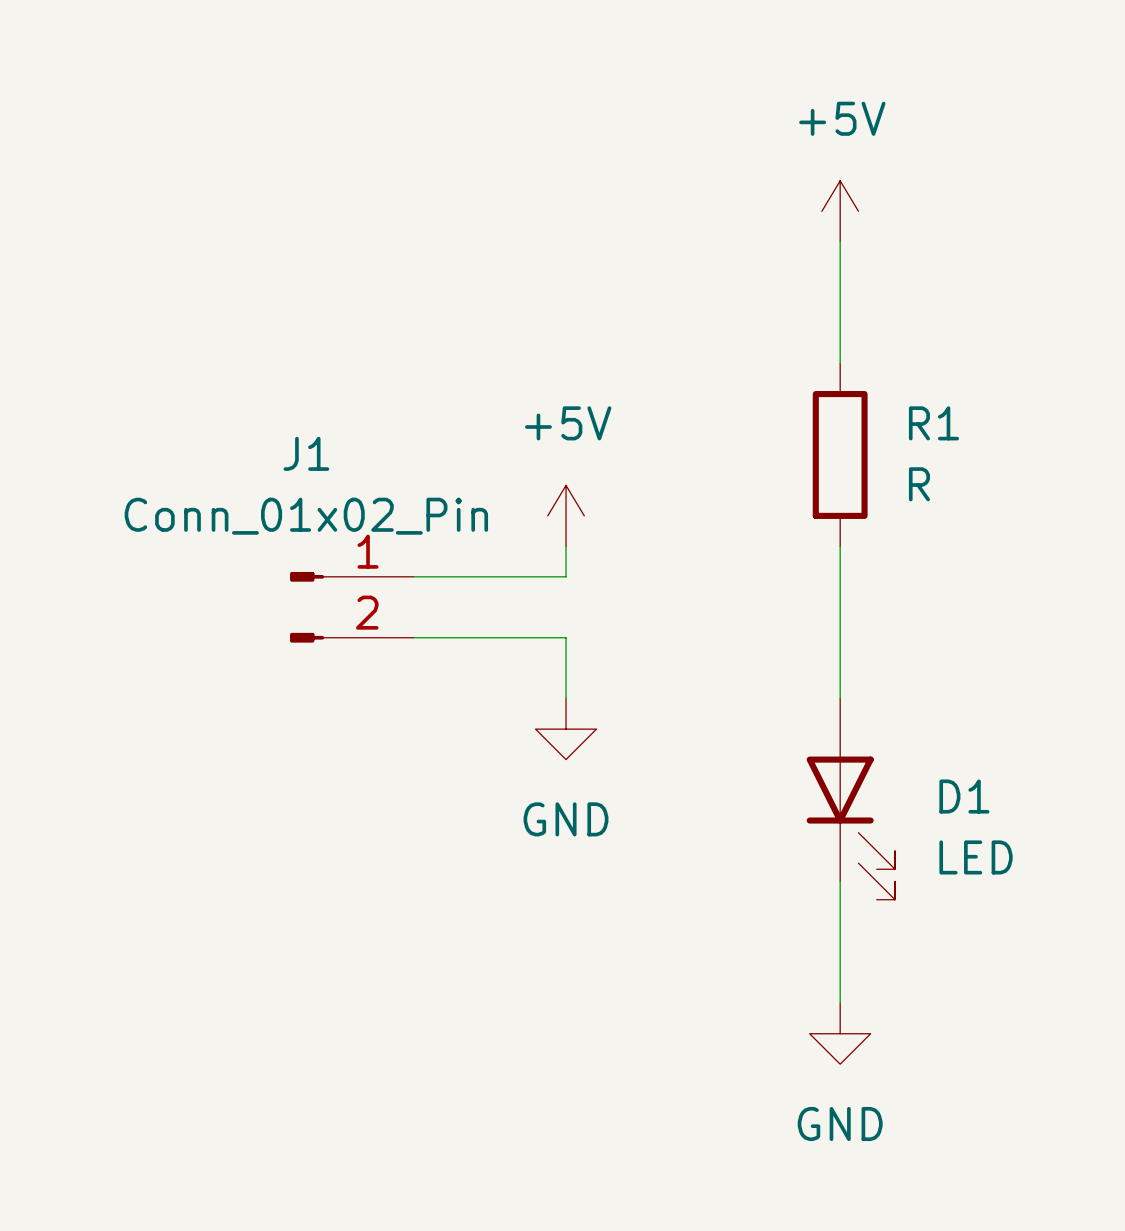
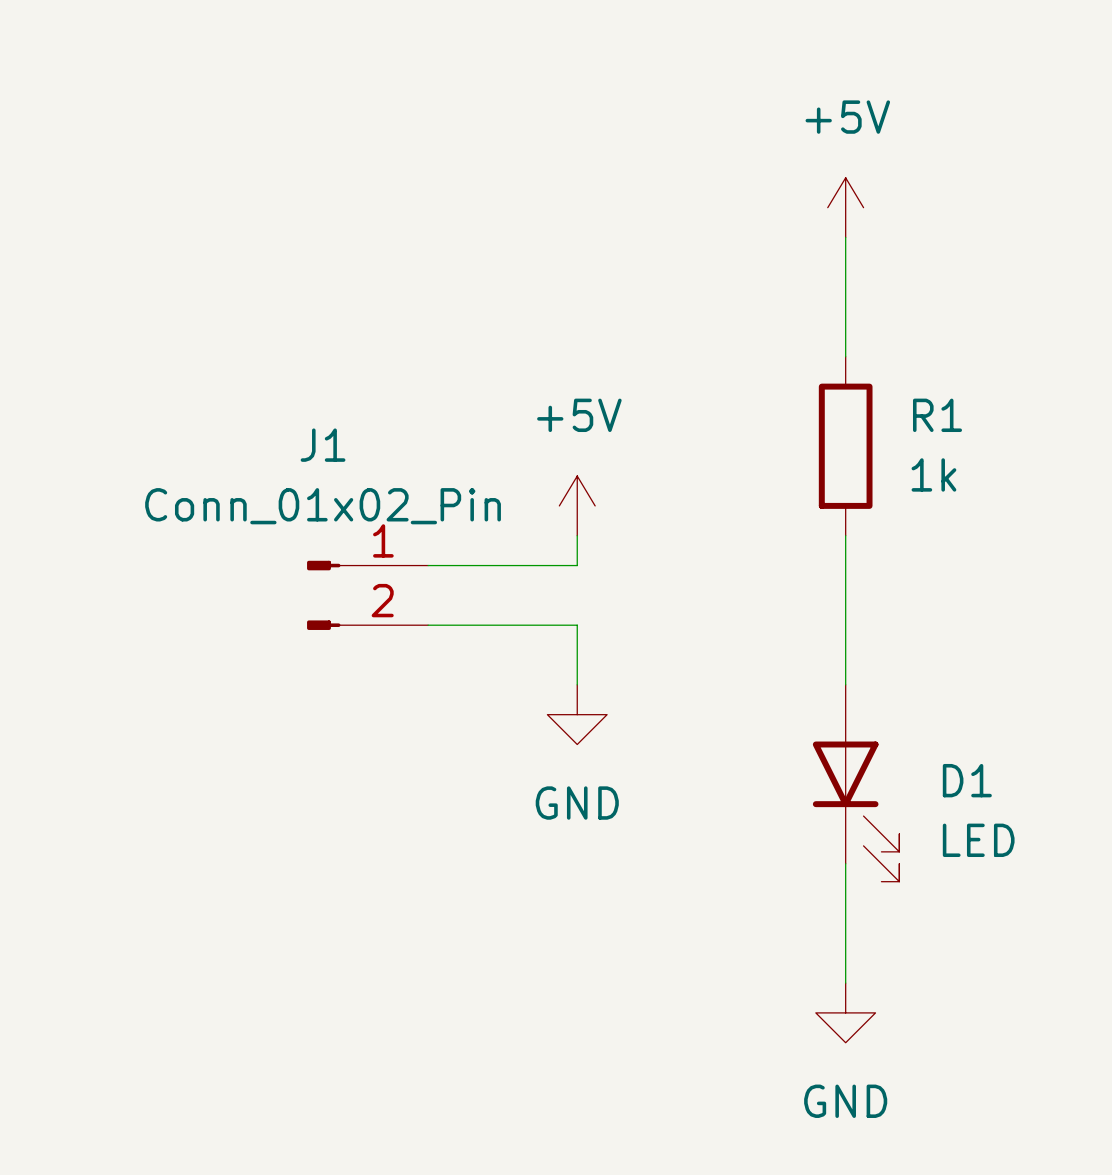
R1 value: R (919, 484) -> 1k (933, 474)

